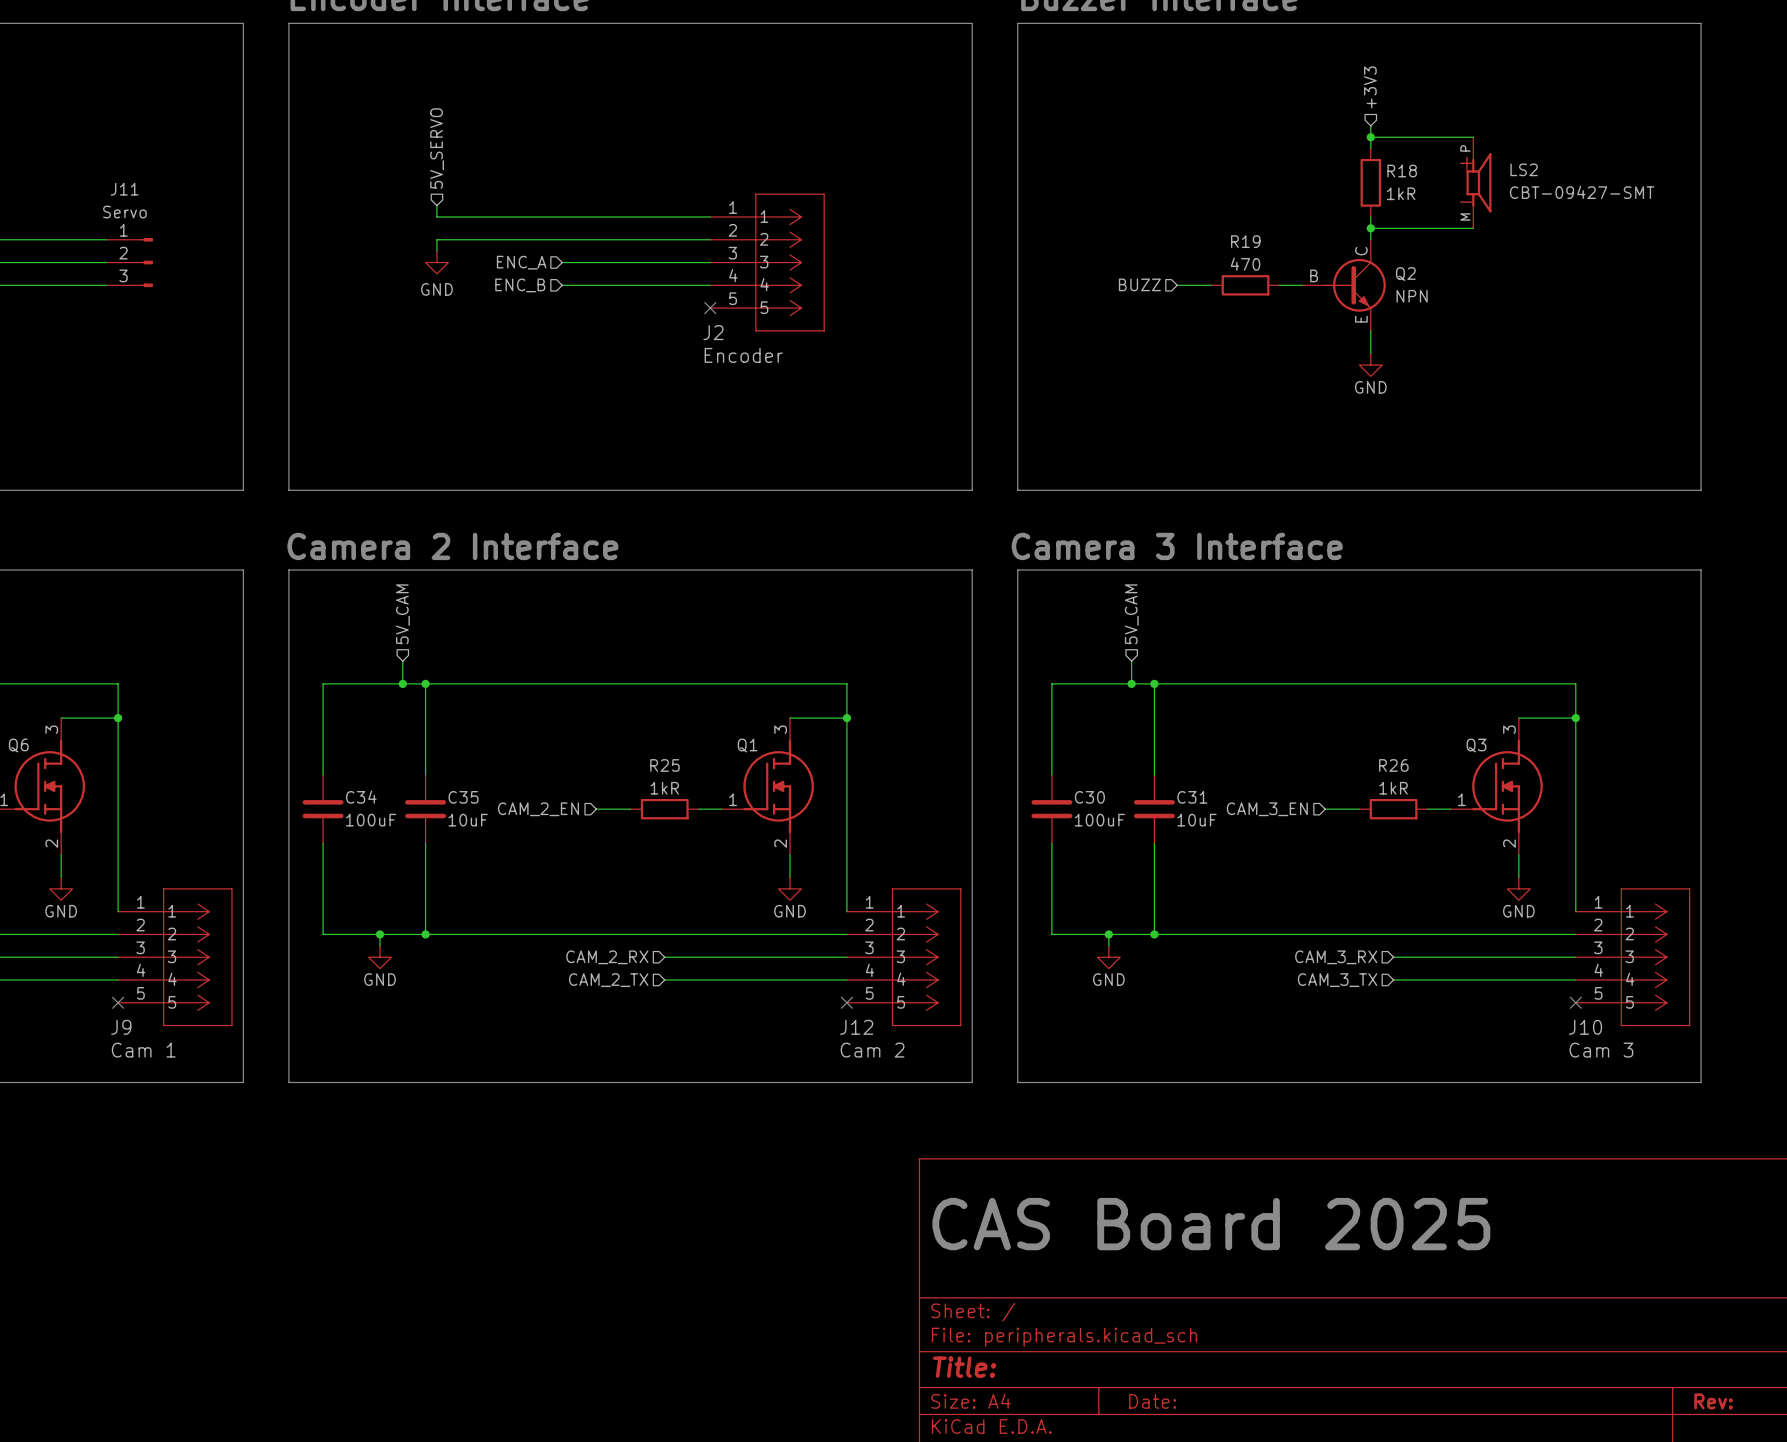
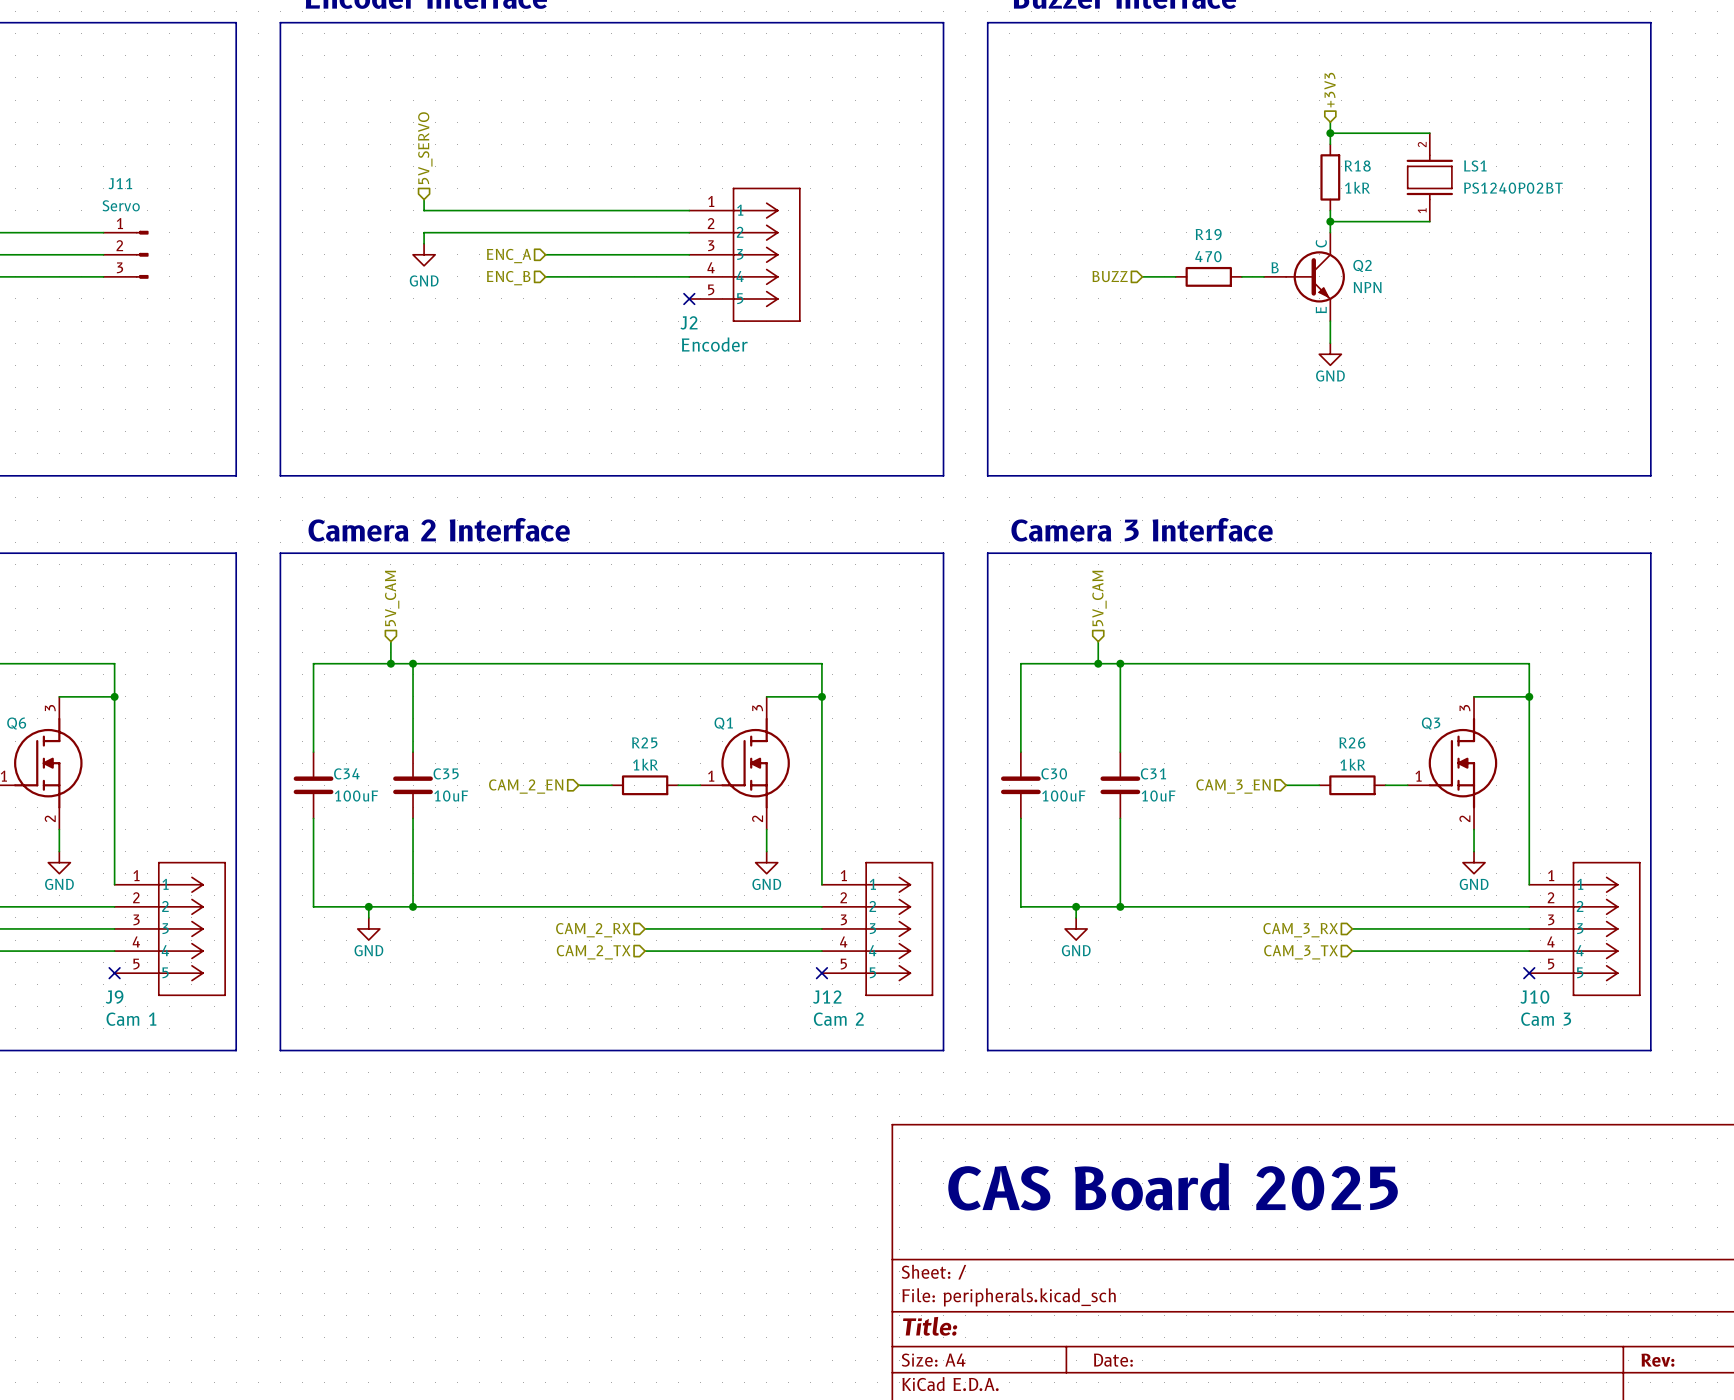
LS1: none -> PS1240P02BT (1429, 177)
LS2: CBT-09427-SMT (1478, 182) -> none

